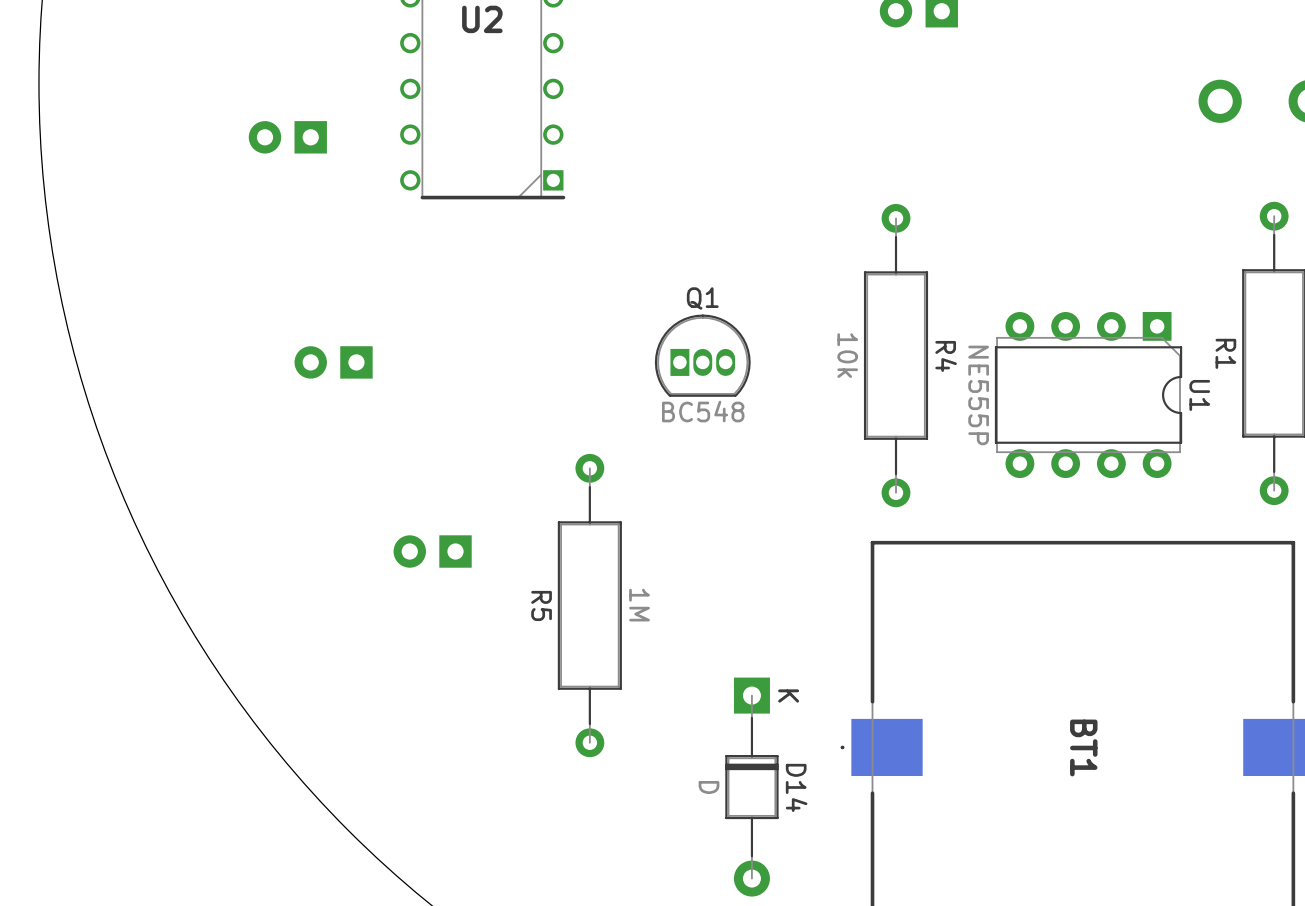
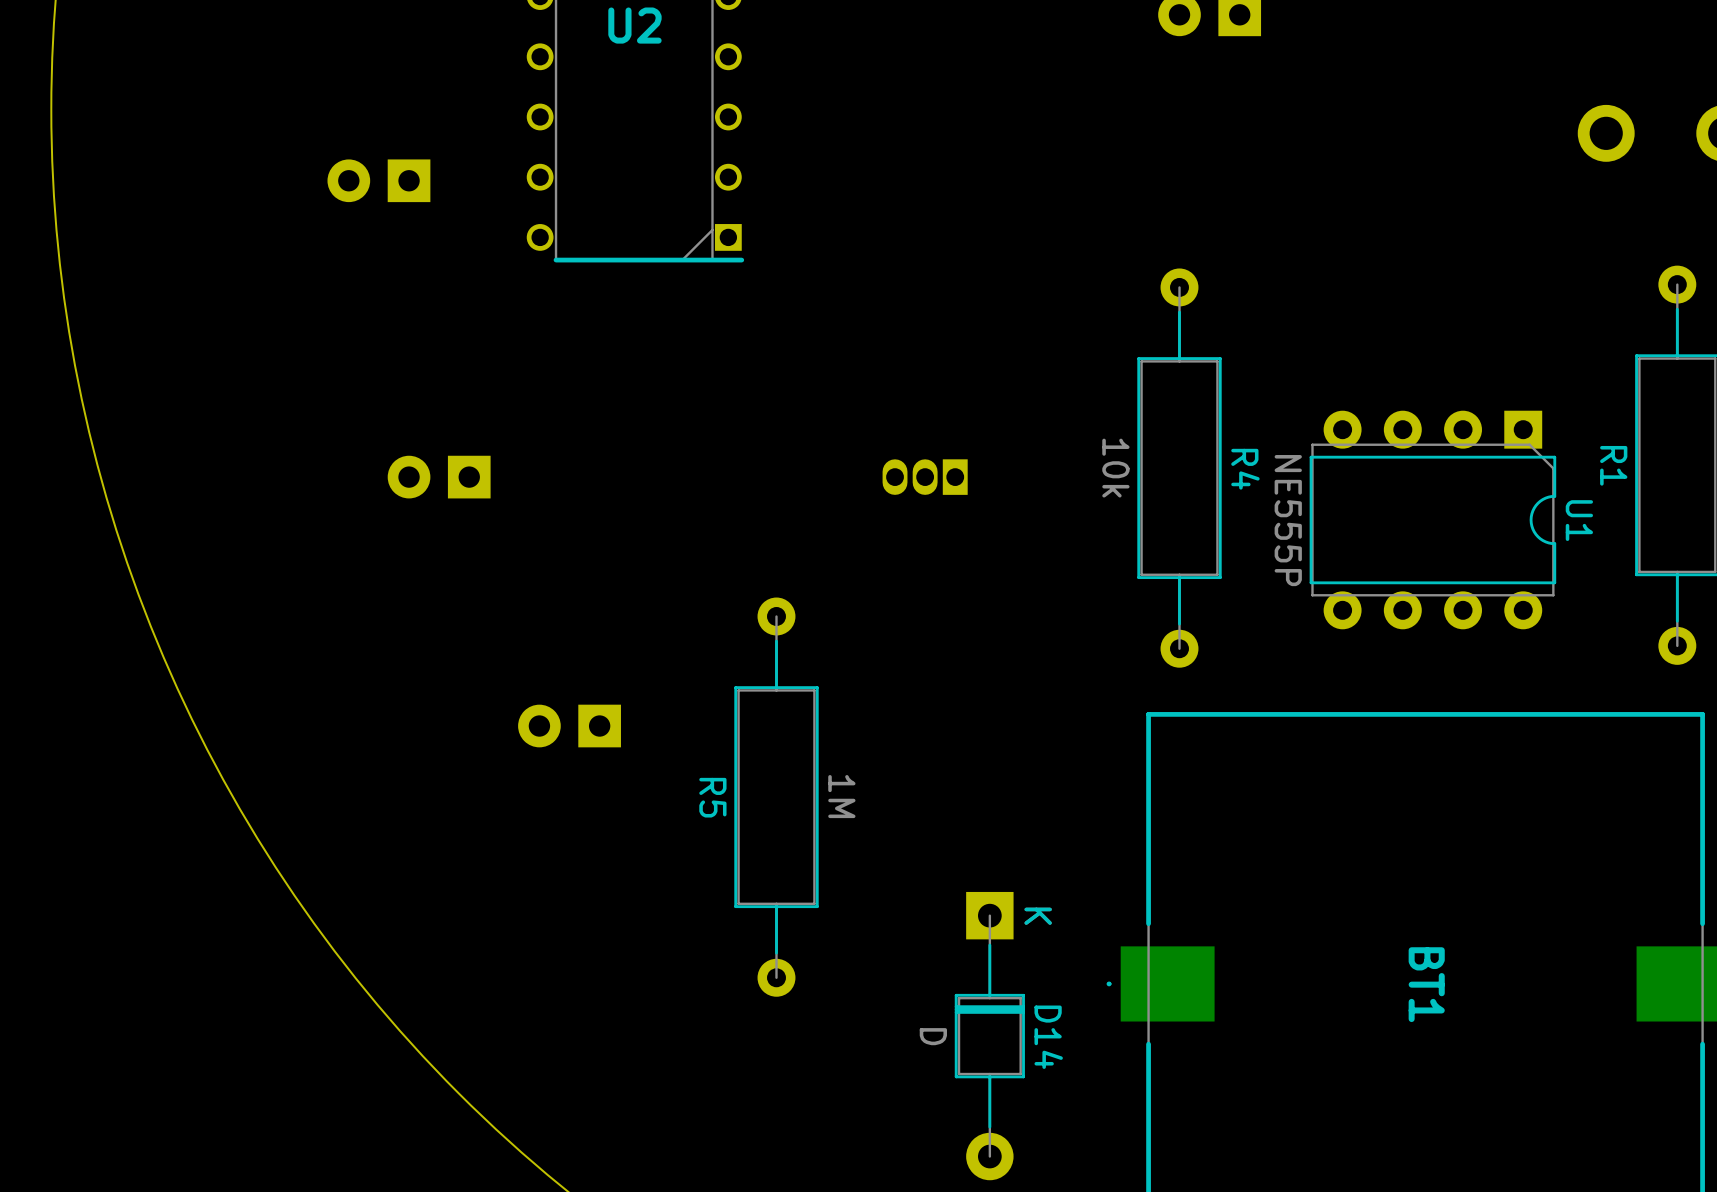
Q1 side: bottom (702, 355) -> top (925, 477)

